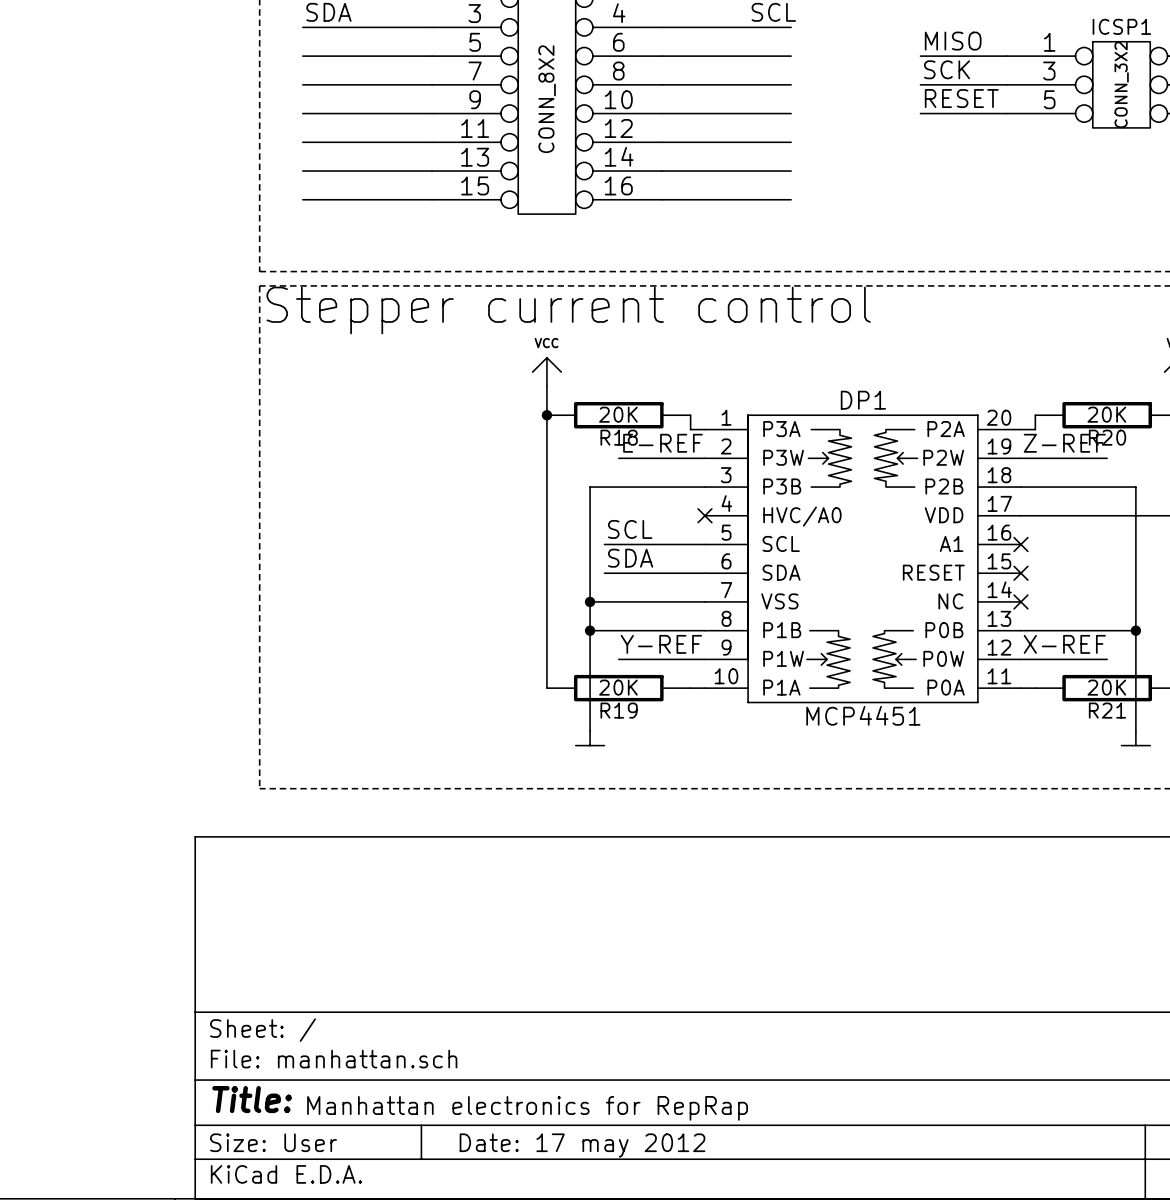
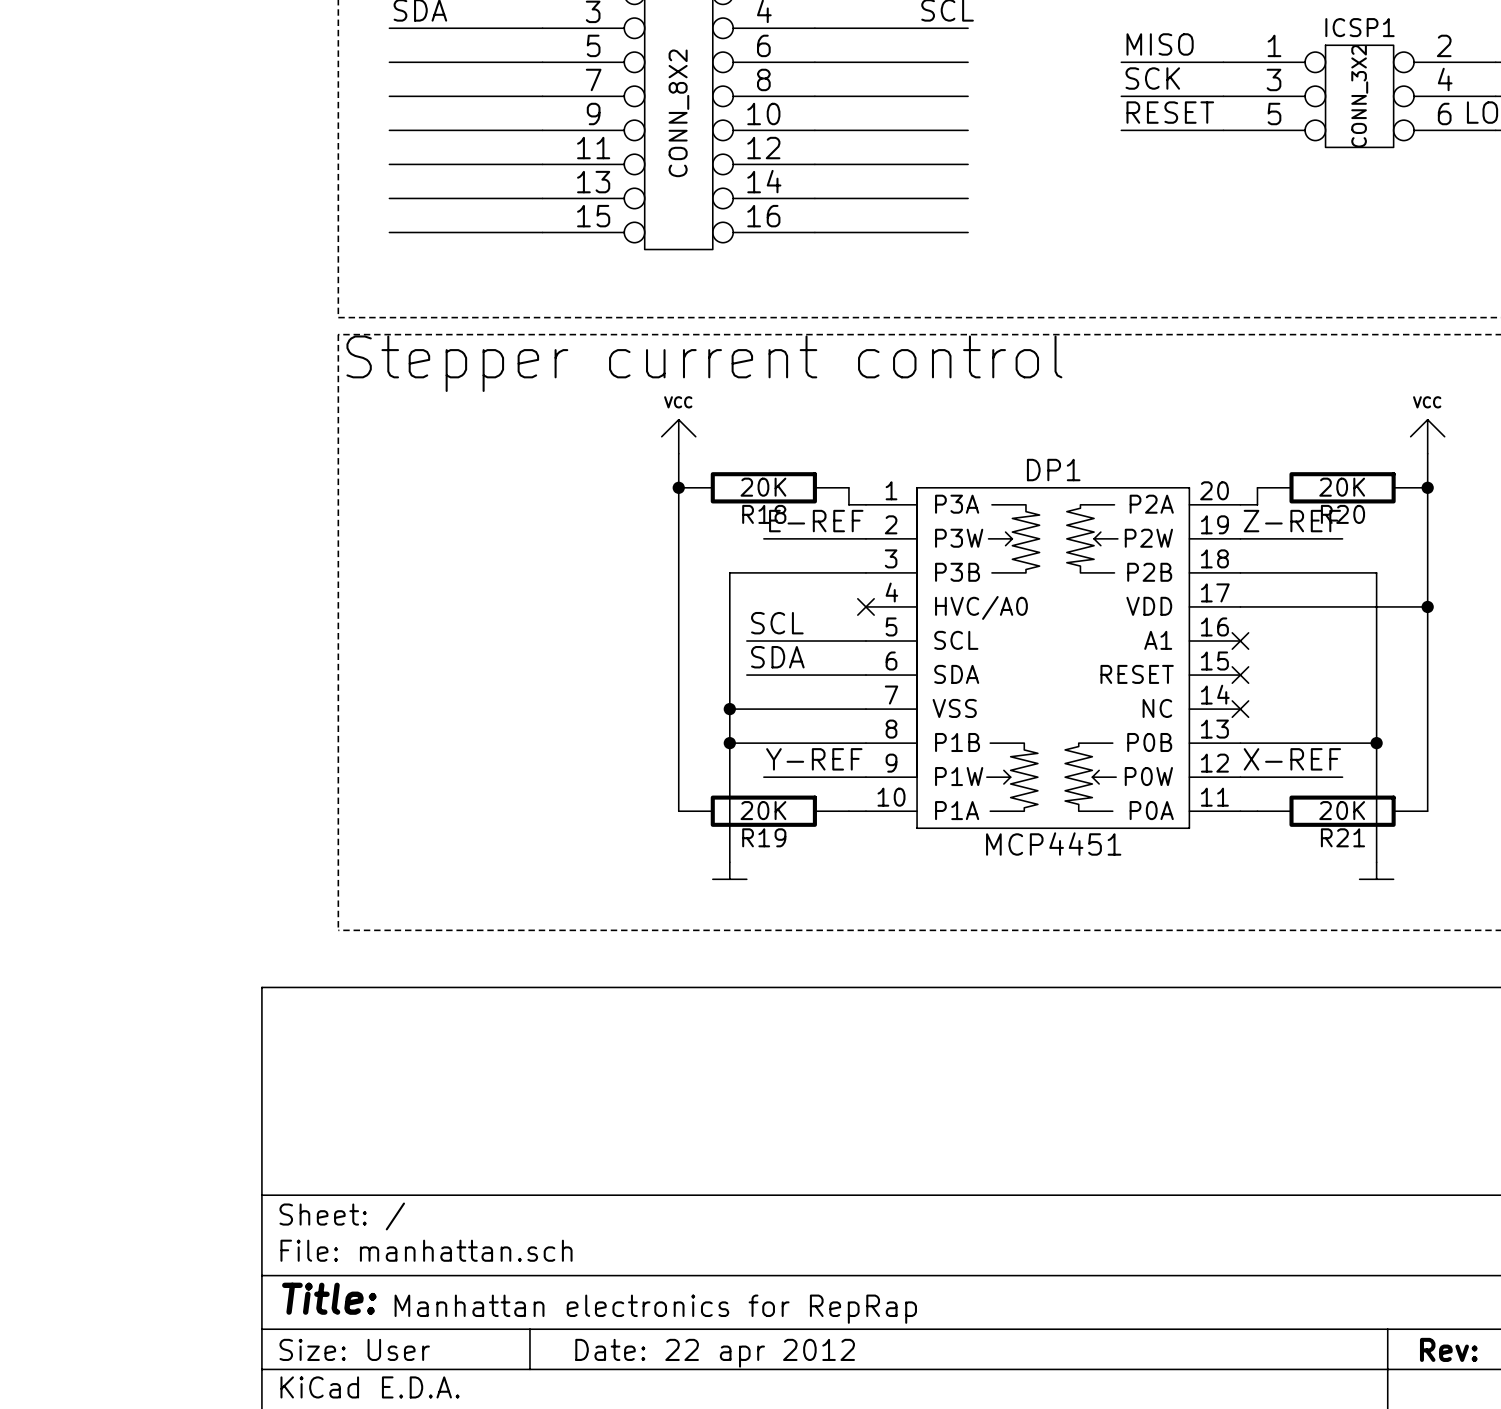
title block: Date: 17 may 2012 (582, 1145) -> Date: 22 apr 2012 (715, 1353)

